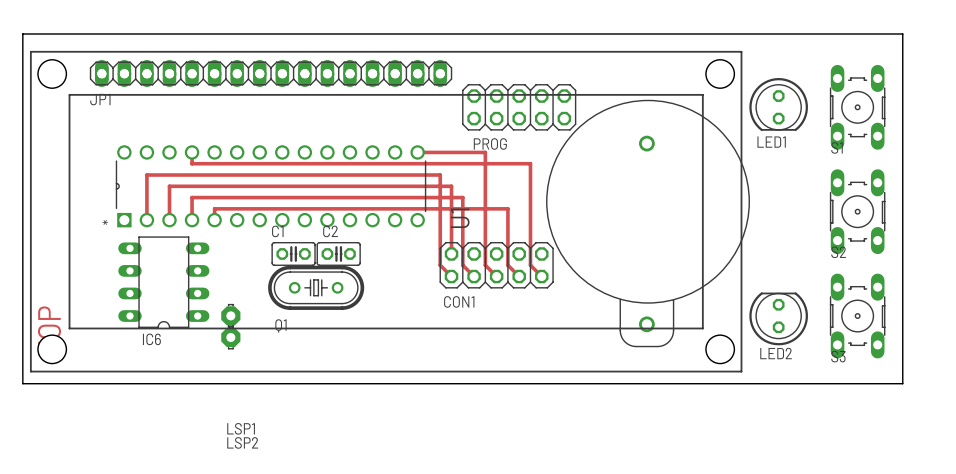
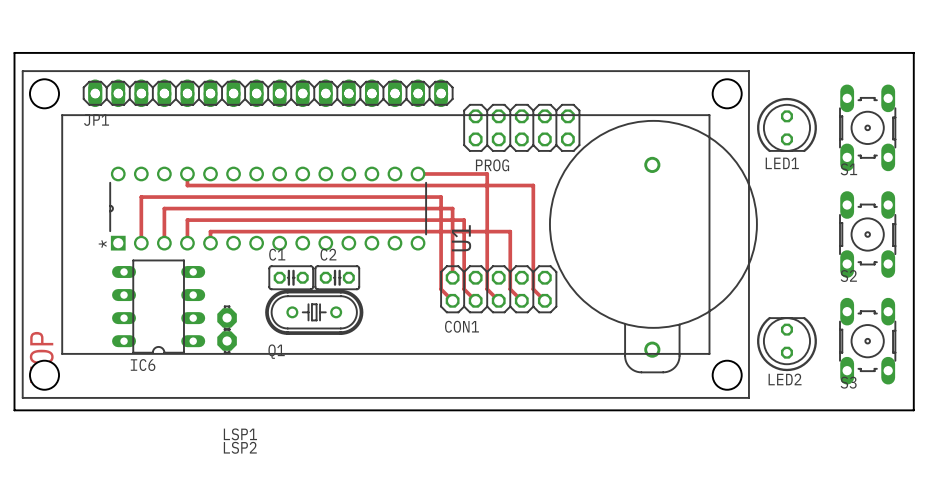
LSP2: none -> (227, 317)
LSP1: (230, 337) -> none
LSP2 name: LSP2 (242, 442) -> LSP1 (240, 434)

